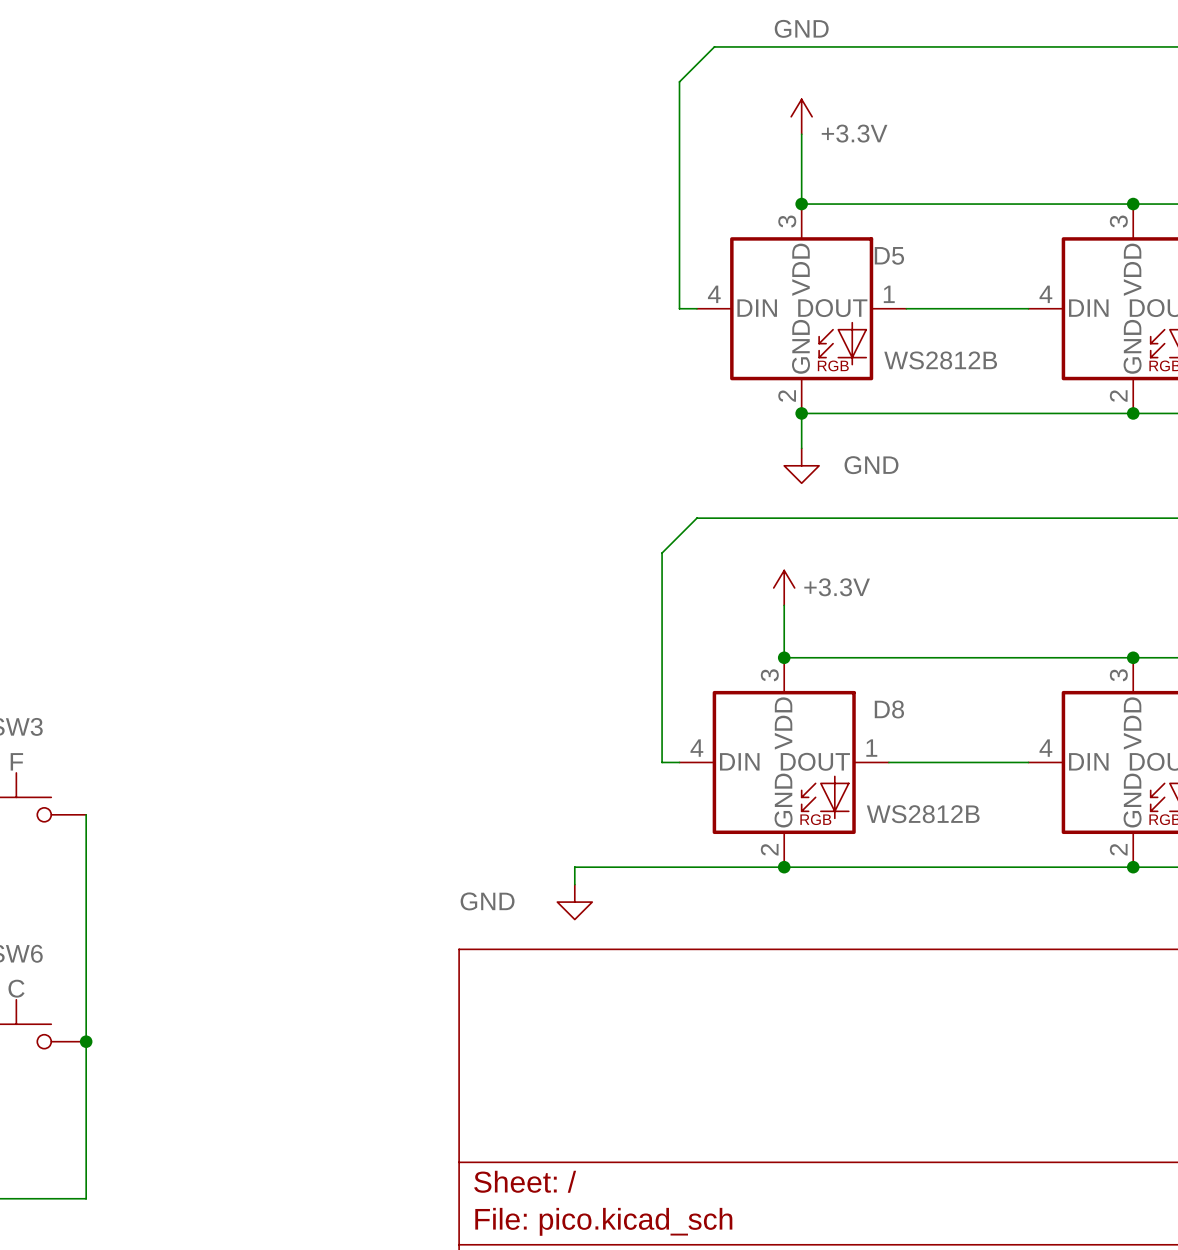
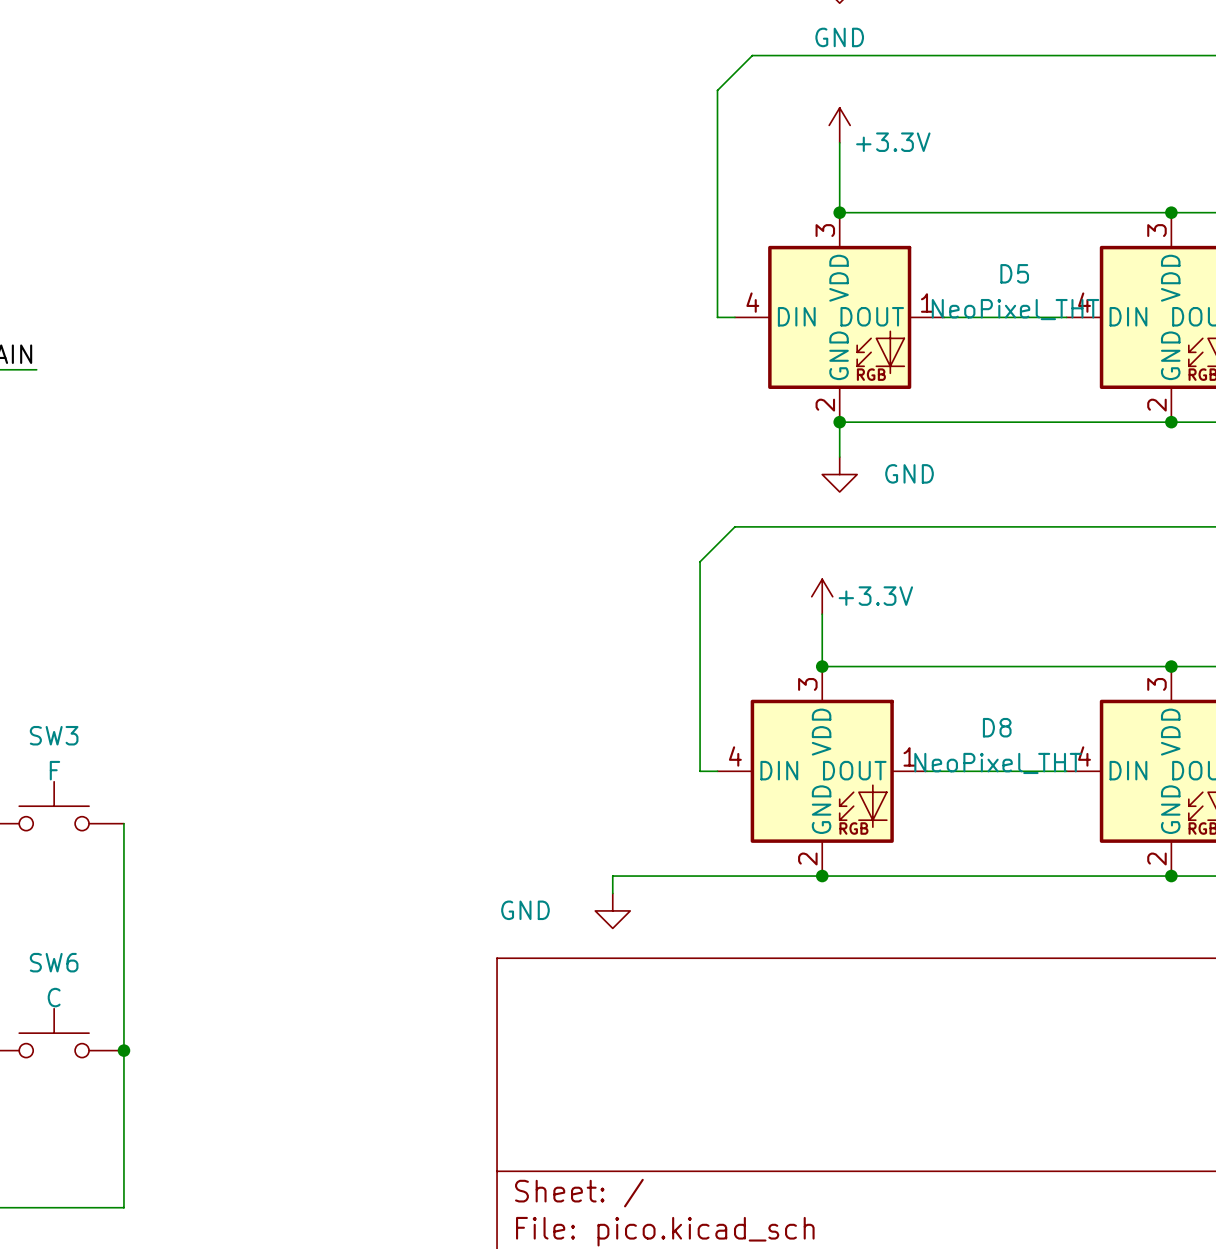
D5 name position: D5 (889, 255) -> D5 (1014, 273)
D5 value: WS2812B (940, 360) -> NeoPixel_THT (1015, 309)
D8 name position: D8 (889, 709) -> D8 (997, 727)
D8 value: WS2812B (923, 814) -> NeoPixel_THT (998, 763)

